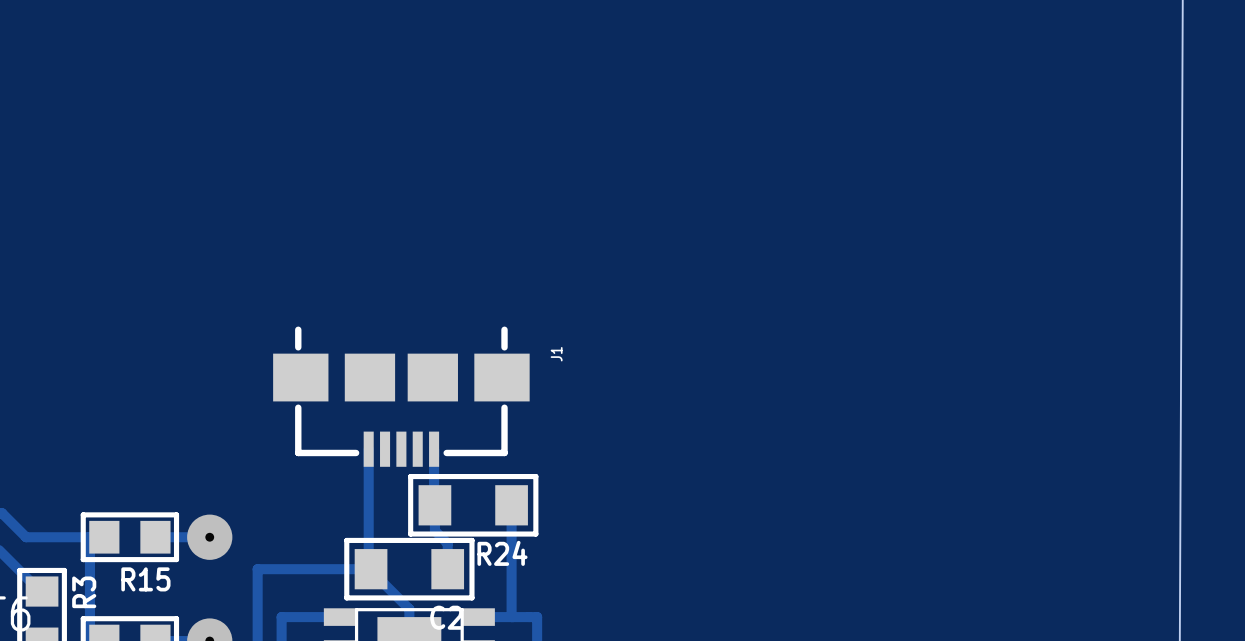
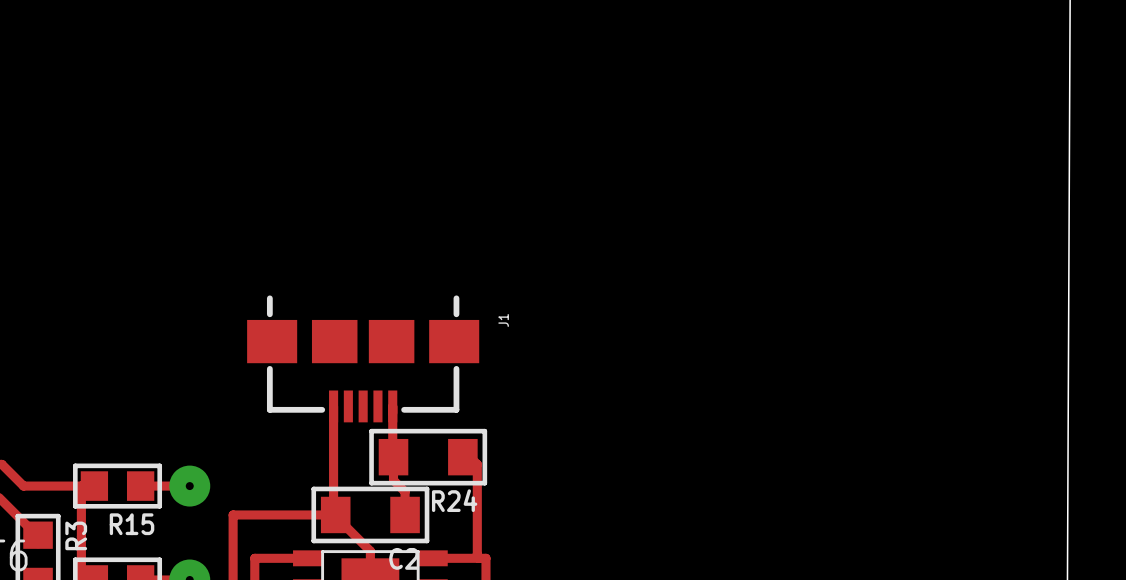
track: (511, 505) (511, 617) -> none
track: none -> (470, 457) (477, 464) (478, 558)

